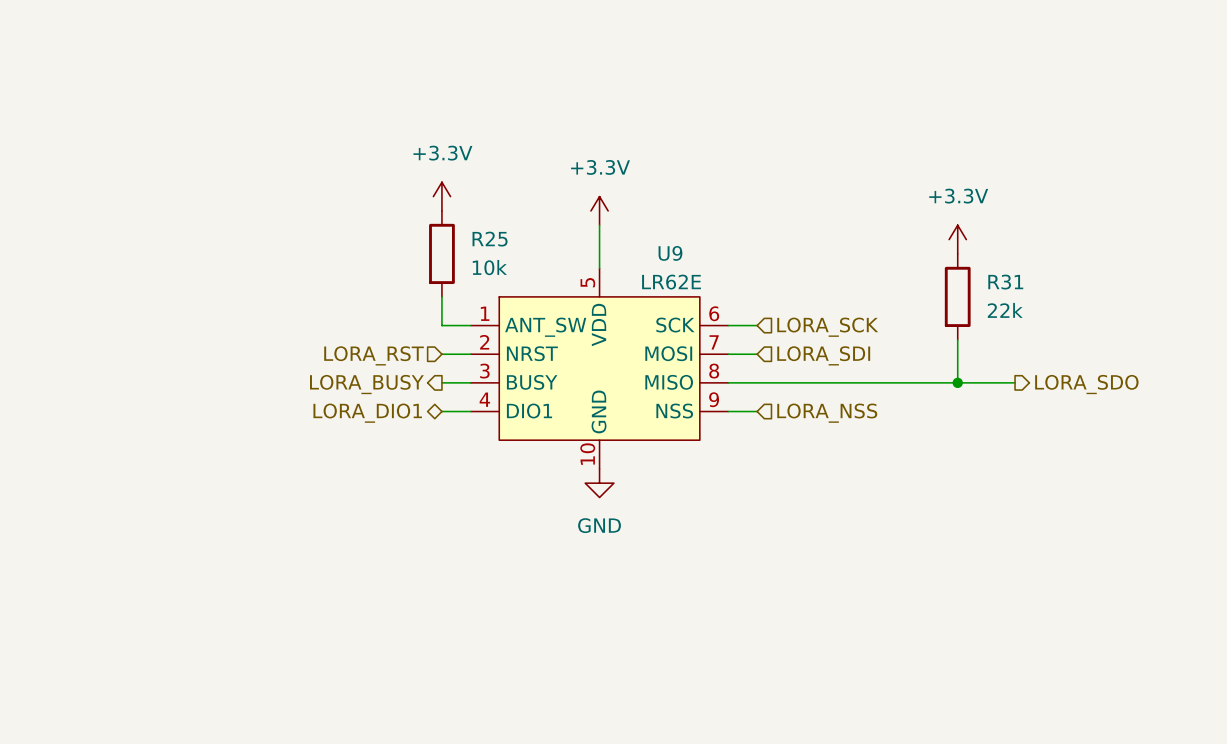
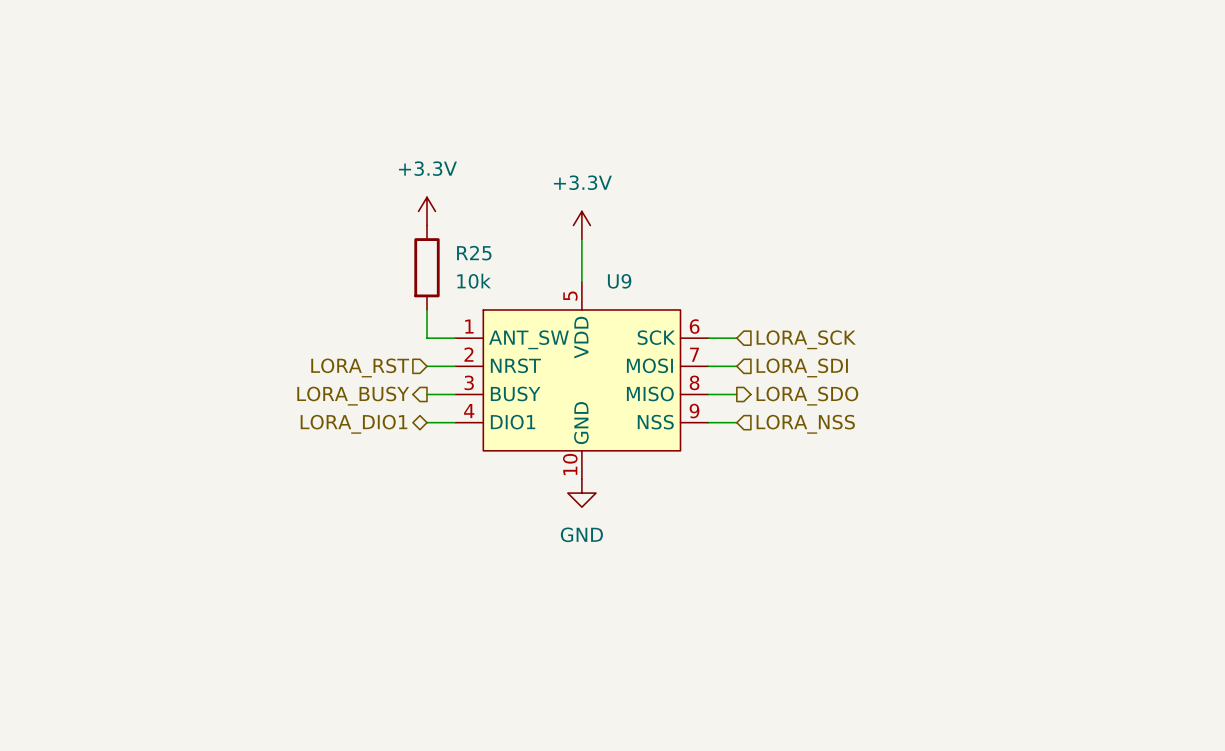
power symbol: +3.3V (957, 239) -> none
U9 name position: U9 (670, 253) -> U9 (619, 281)
U9 value: LR62E (671, 282) -> none
R31: 22k (957, 296) -> none
wire: (957, 339) (957, 382) -> none
wire: (757, 382) (1015, 382) -> none
junction: (957, 382) -> none
hierarchical label position: LORA_SDO (1086, 384) -> LORA_SDO (807, 396)

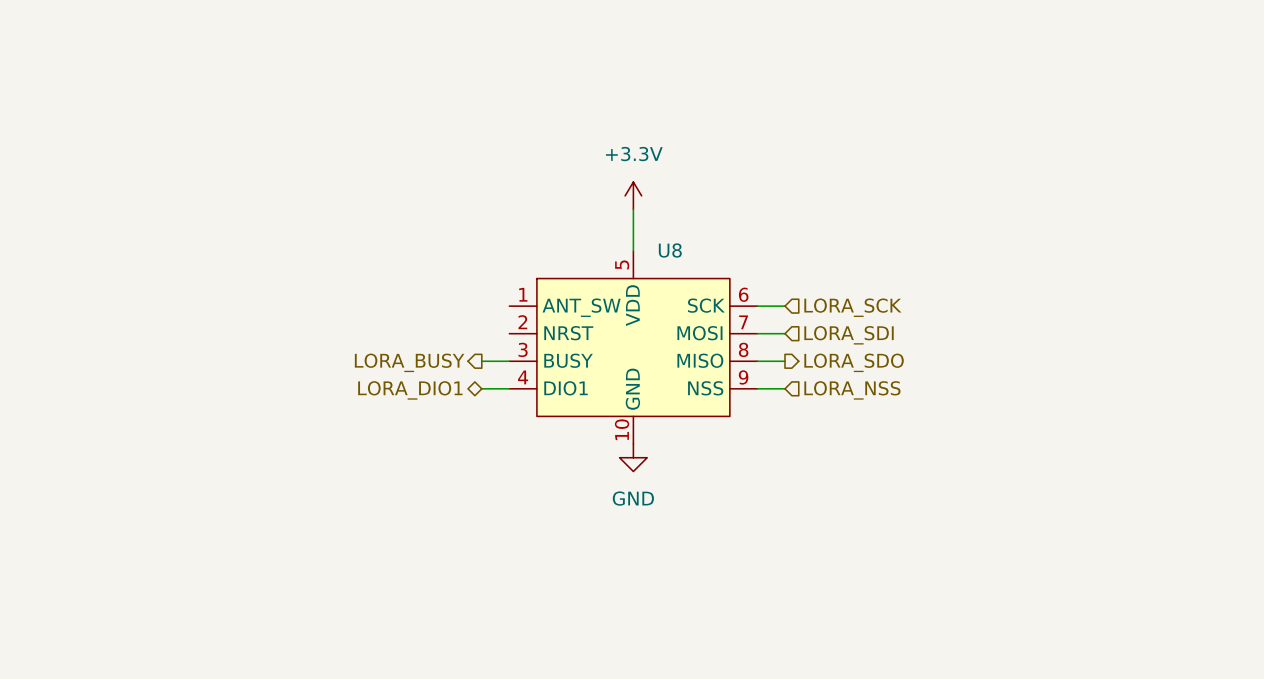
power symbol: +3.3V (427, 211) -> none
R25: 10k (427, 267) -> none
U9 name: U9 (619, 281) -> U8 (670, 250)
wire: (427, 310) (427, 338) (455, 338) -> none
wire: (427, 366) (455, 366) -> none
hierarchical label: LORA_RST (360, 367) -> none

